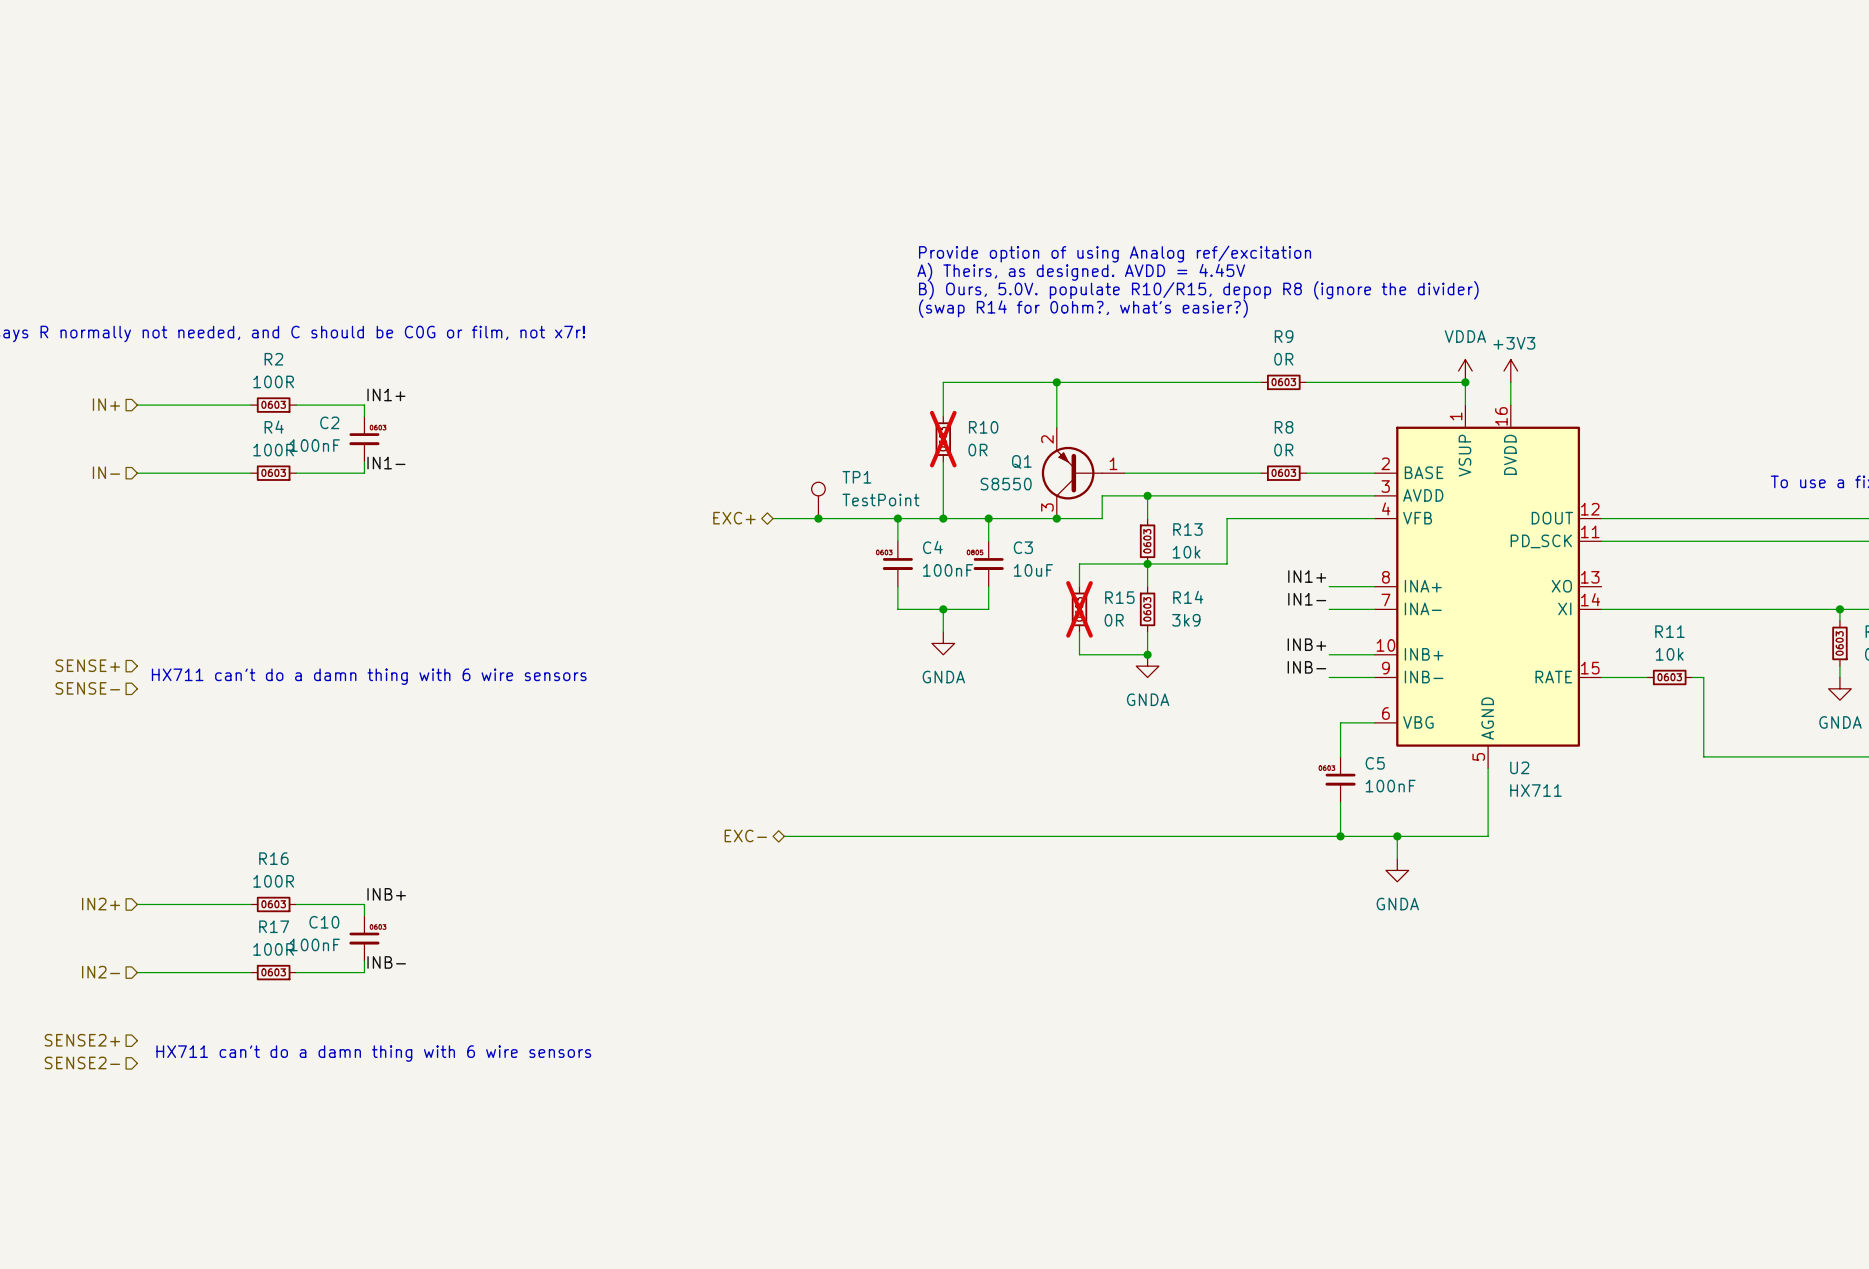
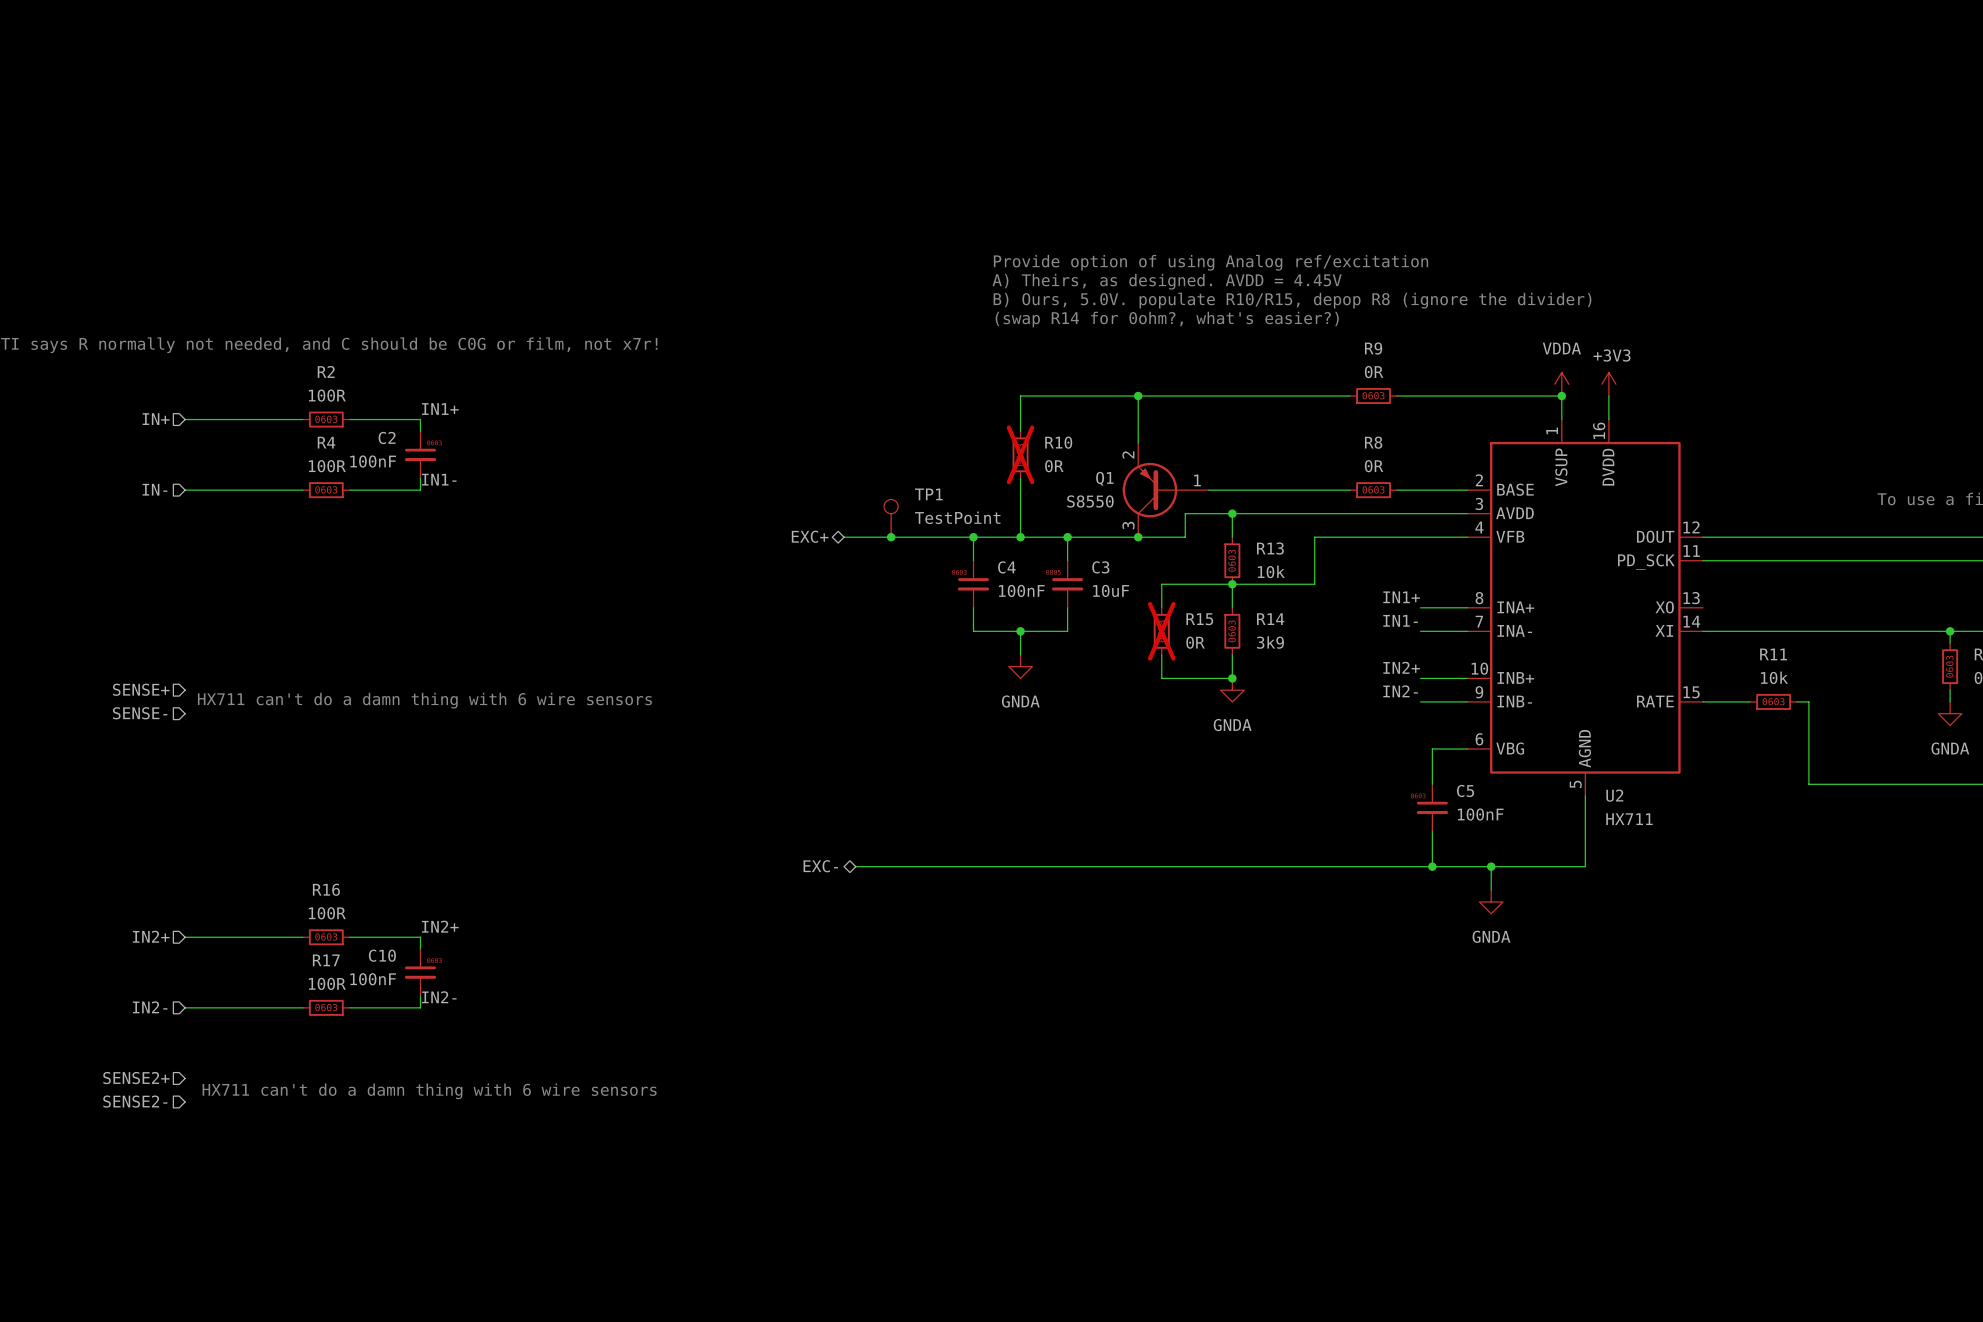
label: INB+ (1306, 644) -> IN2+ (1401, 667)
label: INB- (1306, 667) -> IN2- (1400, 691)
label: INB+ (386, 894) -> IN2+ (440, 926)
label: INB- (386, 962) -> IN2- (439, 997)

